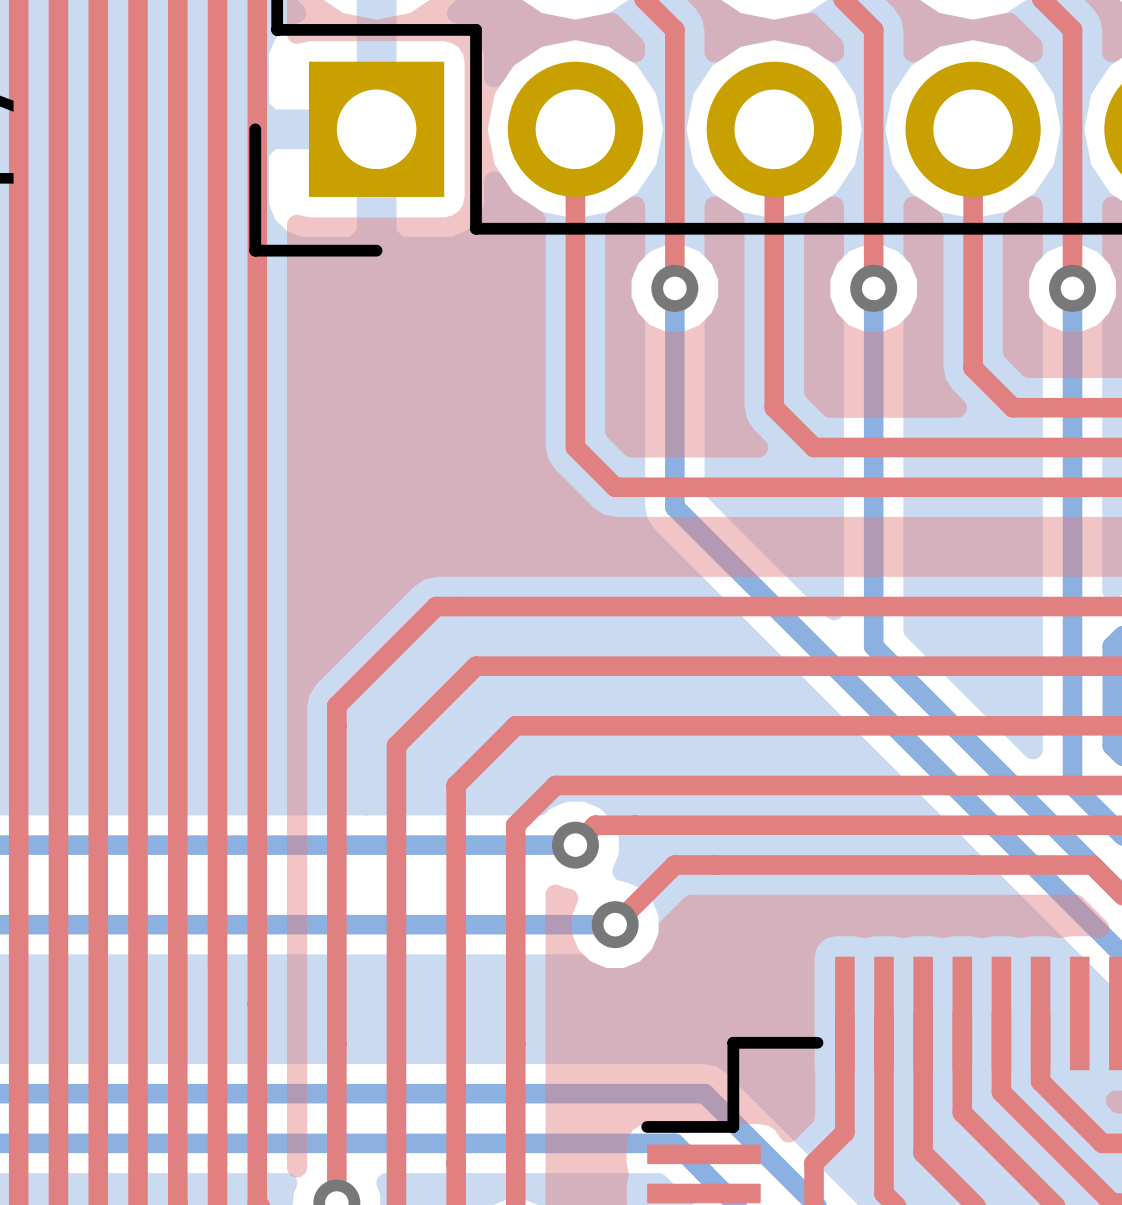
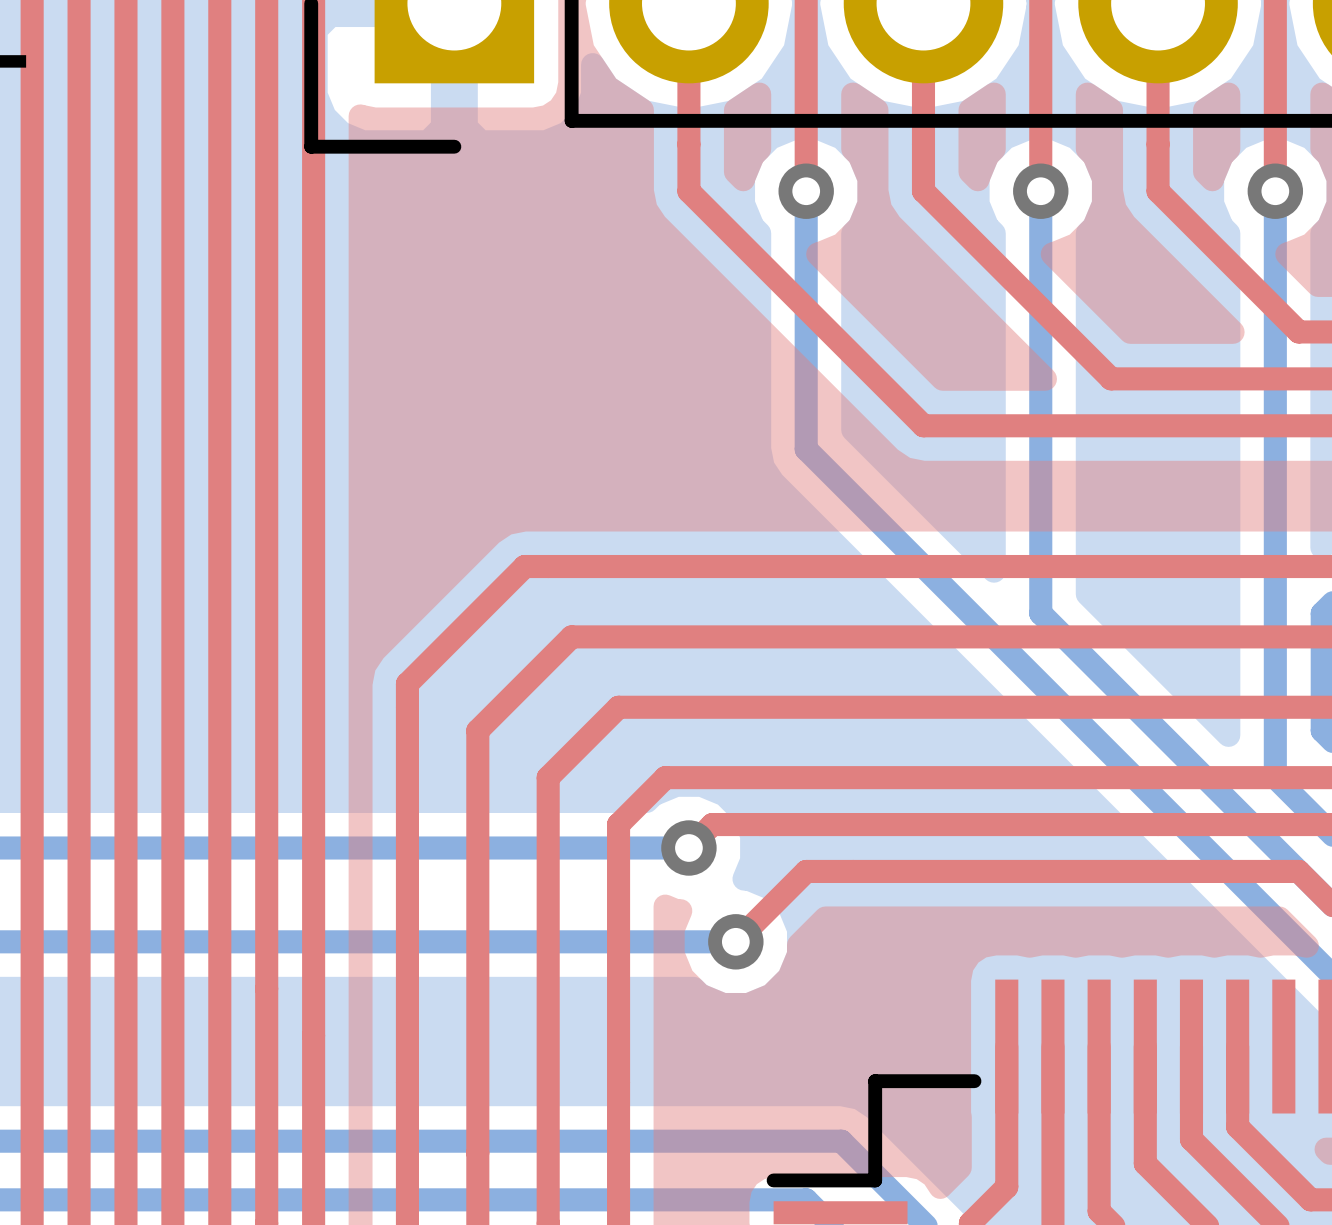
top track: (575, 288) (575, 447) (615, 487) (774, 487) -> (688, 191) (923, 425)
top track: (774, 288) (774, 407) (814, 447) (933, 447) -> (923, 191) (1111, 378)
top track: (973, 288) (973, 367) (1012, 407) (1092, 407) -> (1158, 191) (1298, 331)

